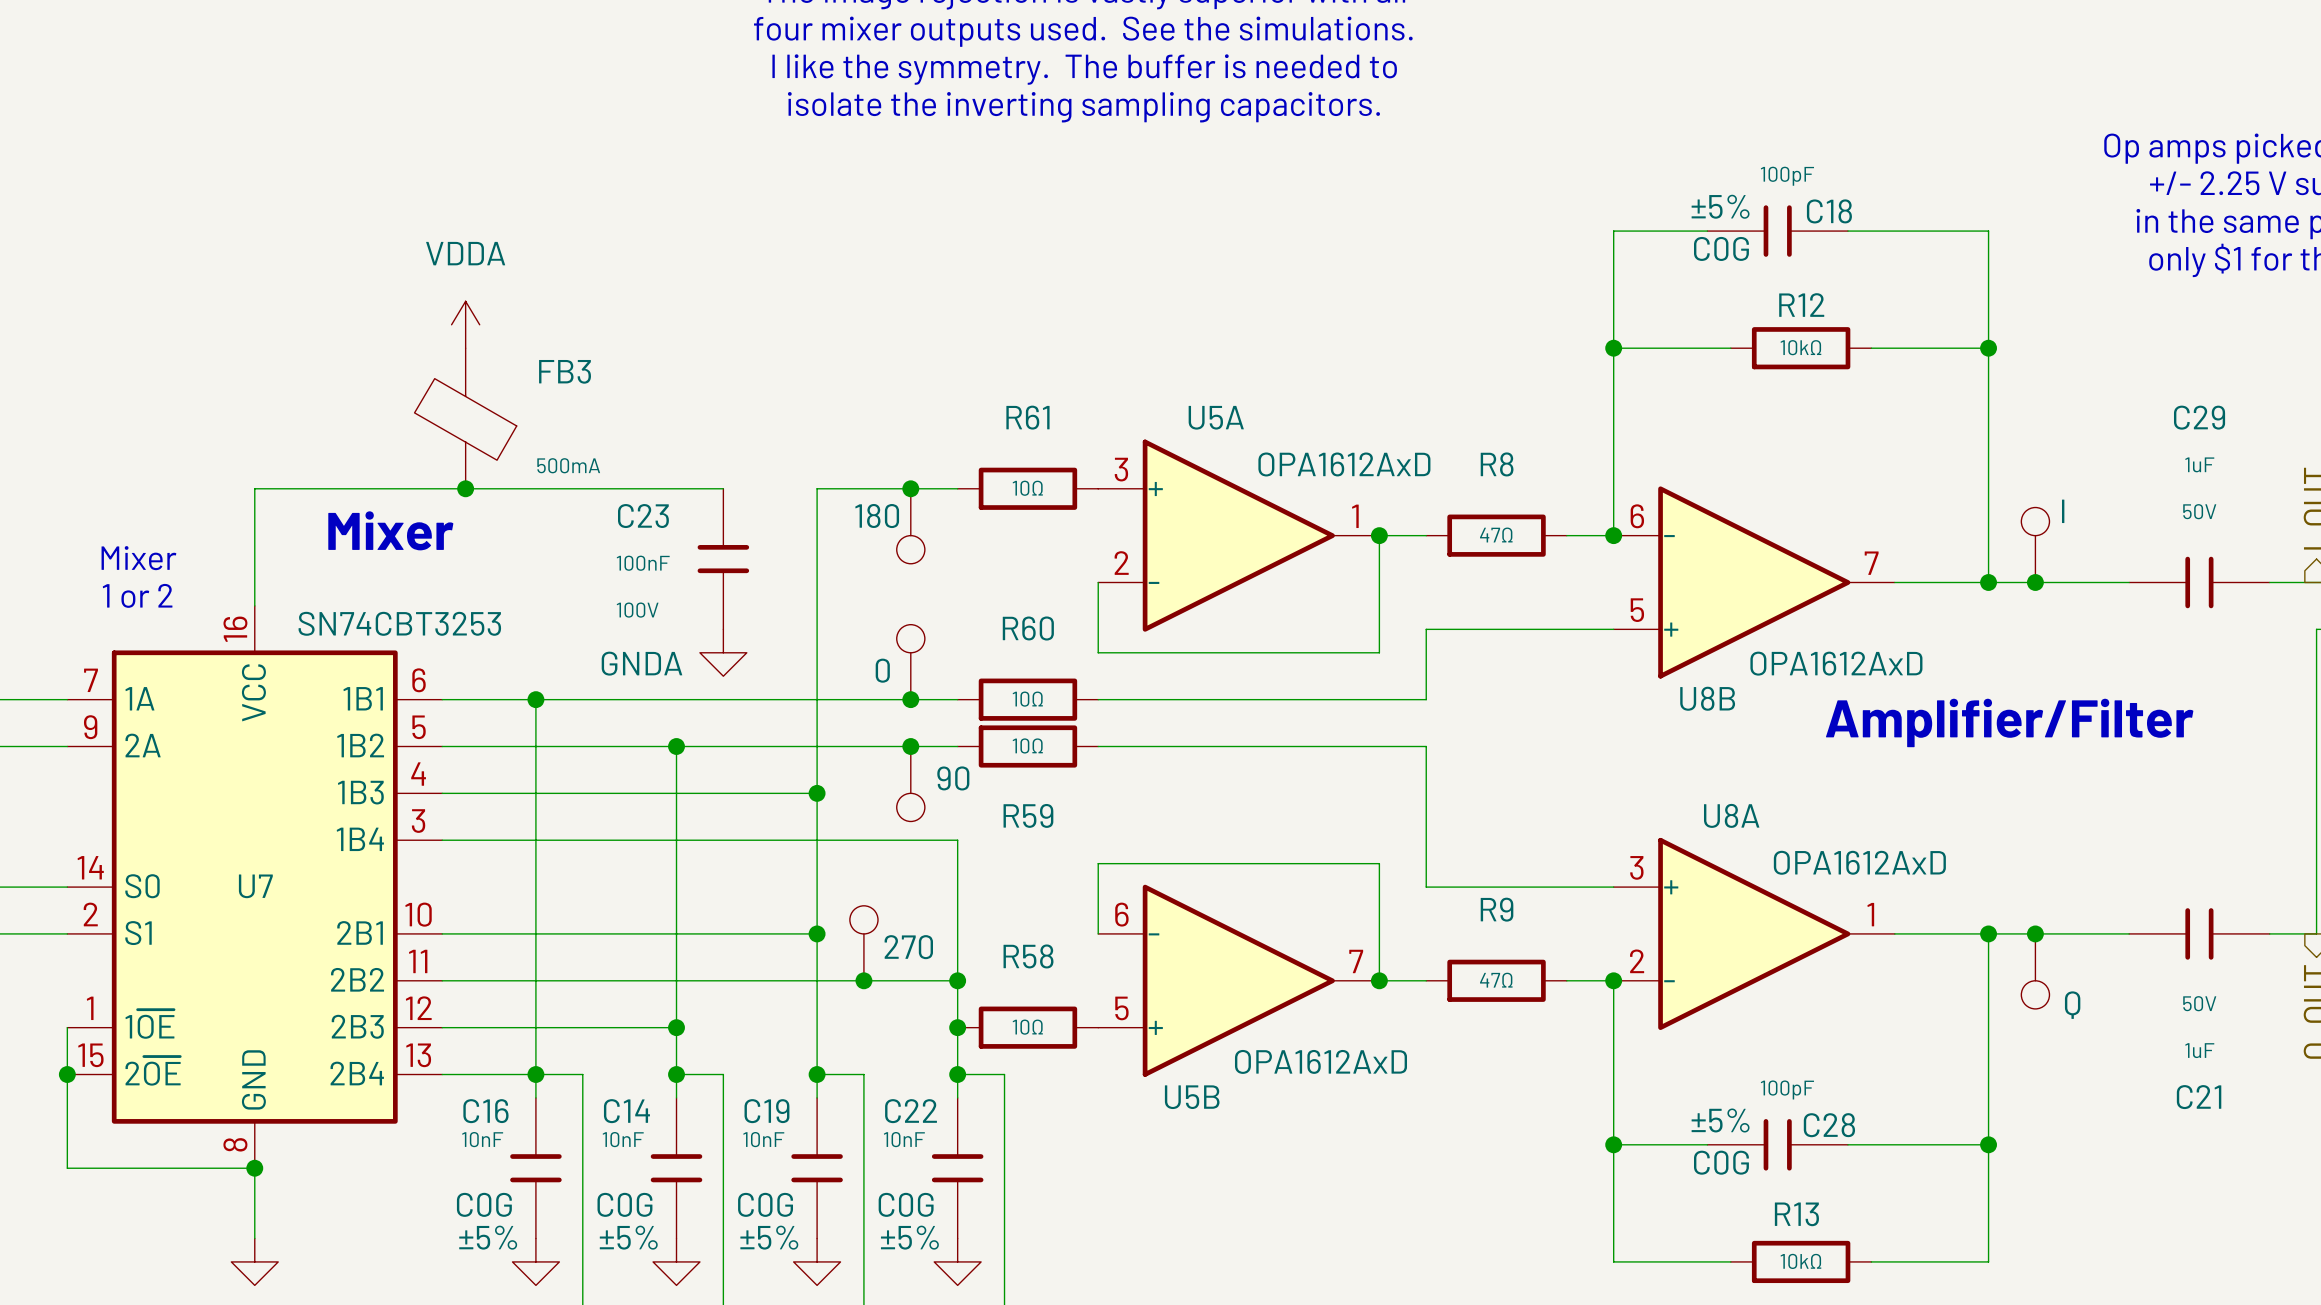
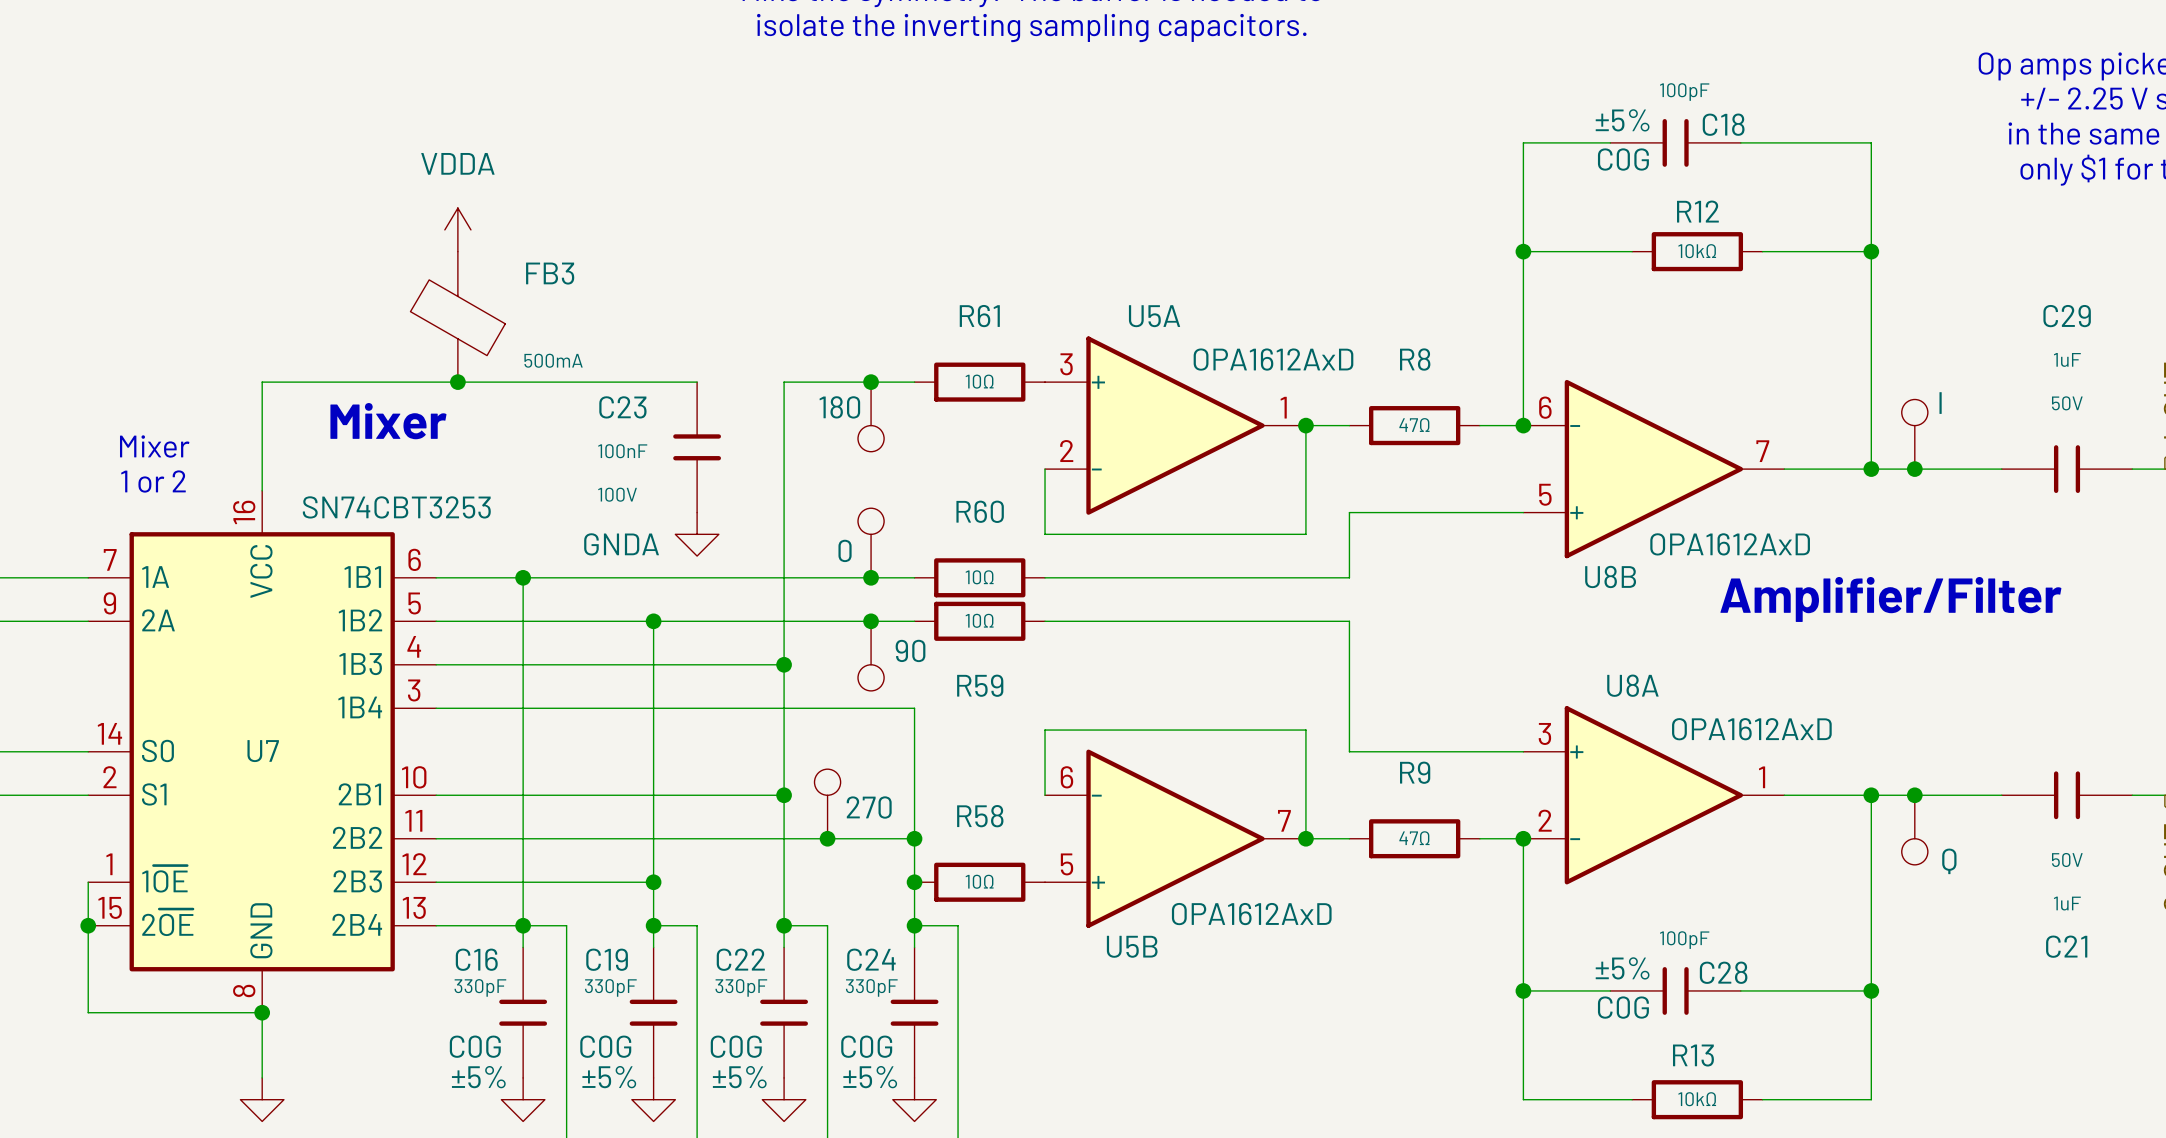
C14 name: C14 (626, 1111) -> C19 (607, 959)
C19 name: C19 (766, 1111) -> C22 (740, 959)
C22 name: C22 (911, 1111) -> C24 (871, 959)
C16 value: 10nF (482, 1139) -> 330pF (480, 987)
C14 value: 10nF (623, 1139) -> 330pF (610, 987)
C19 value: 10nF (763, 1139) -> 330pF (741, 987)
C22 value: 10nF (904, 1139) -> 330pF (871, 987)

